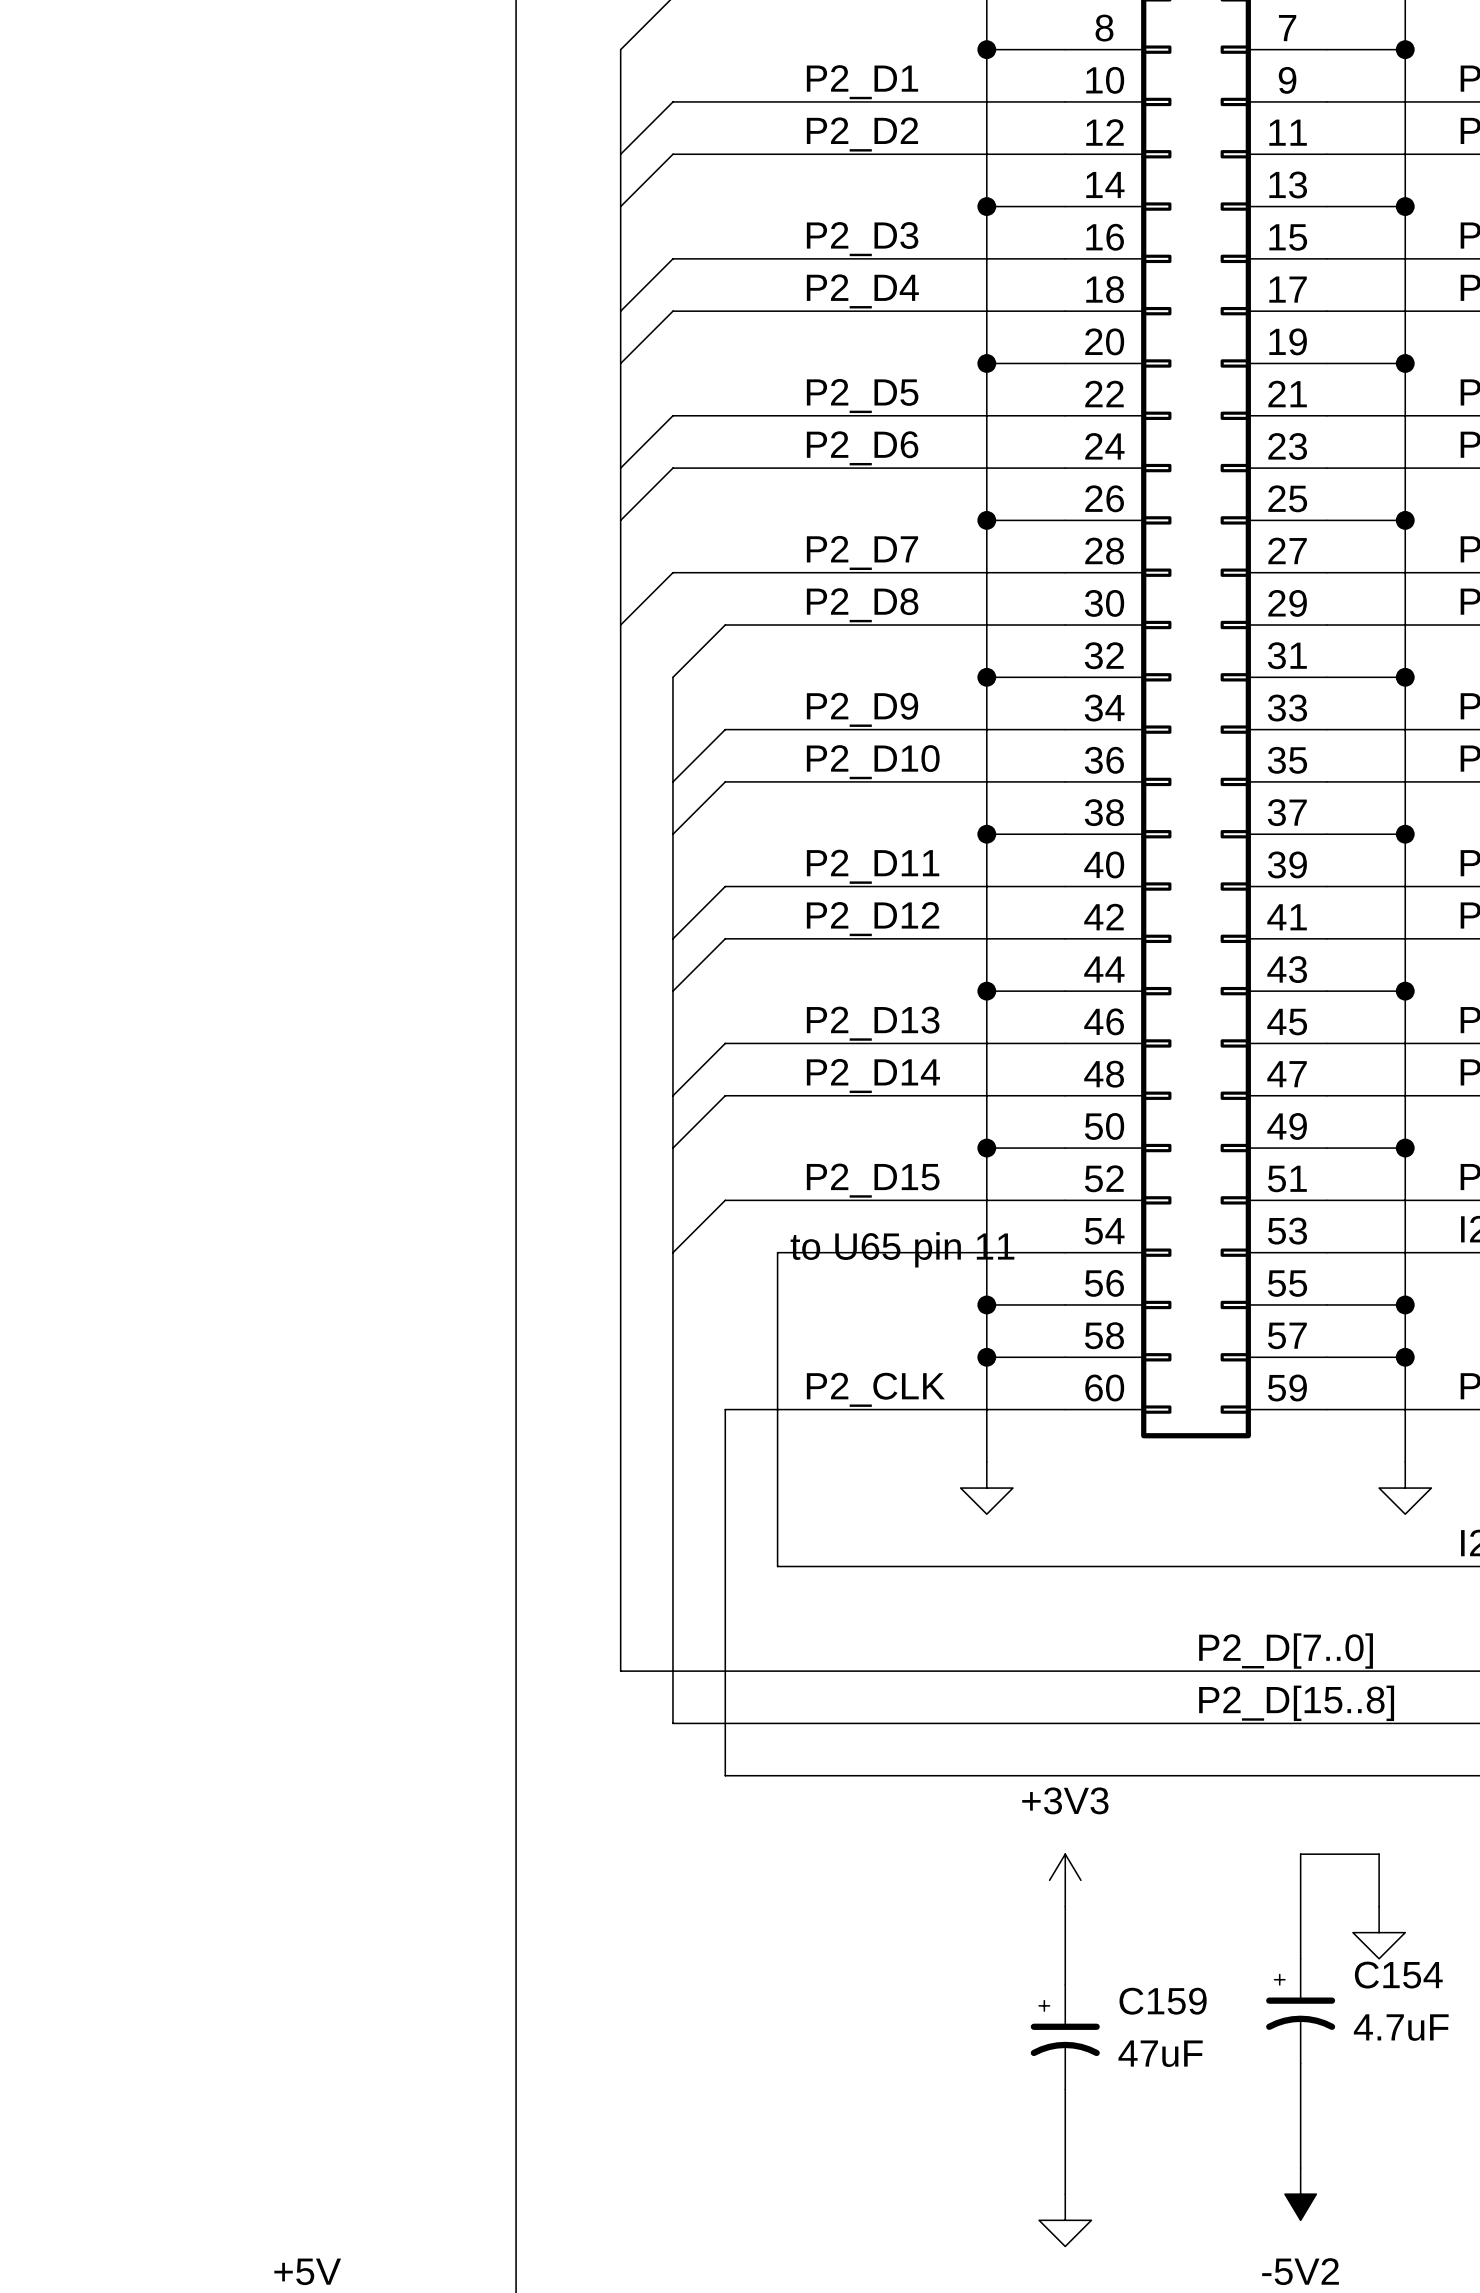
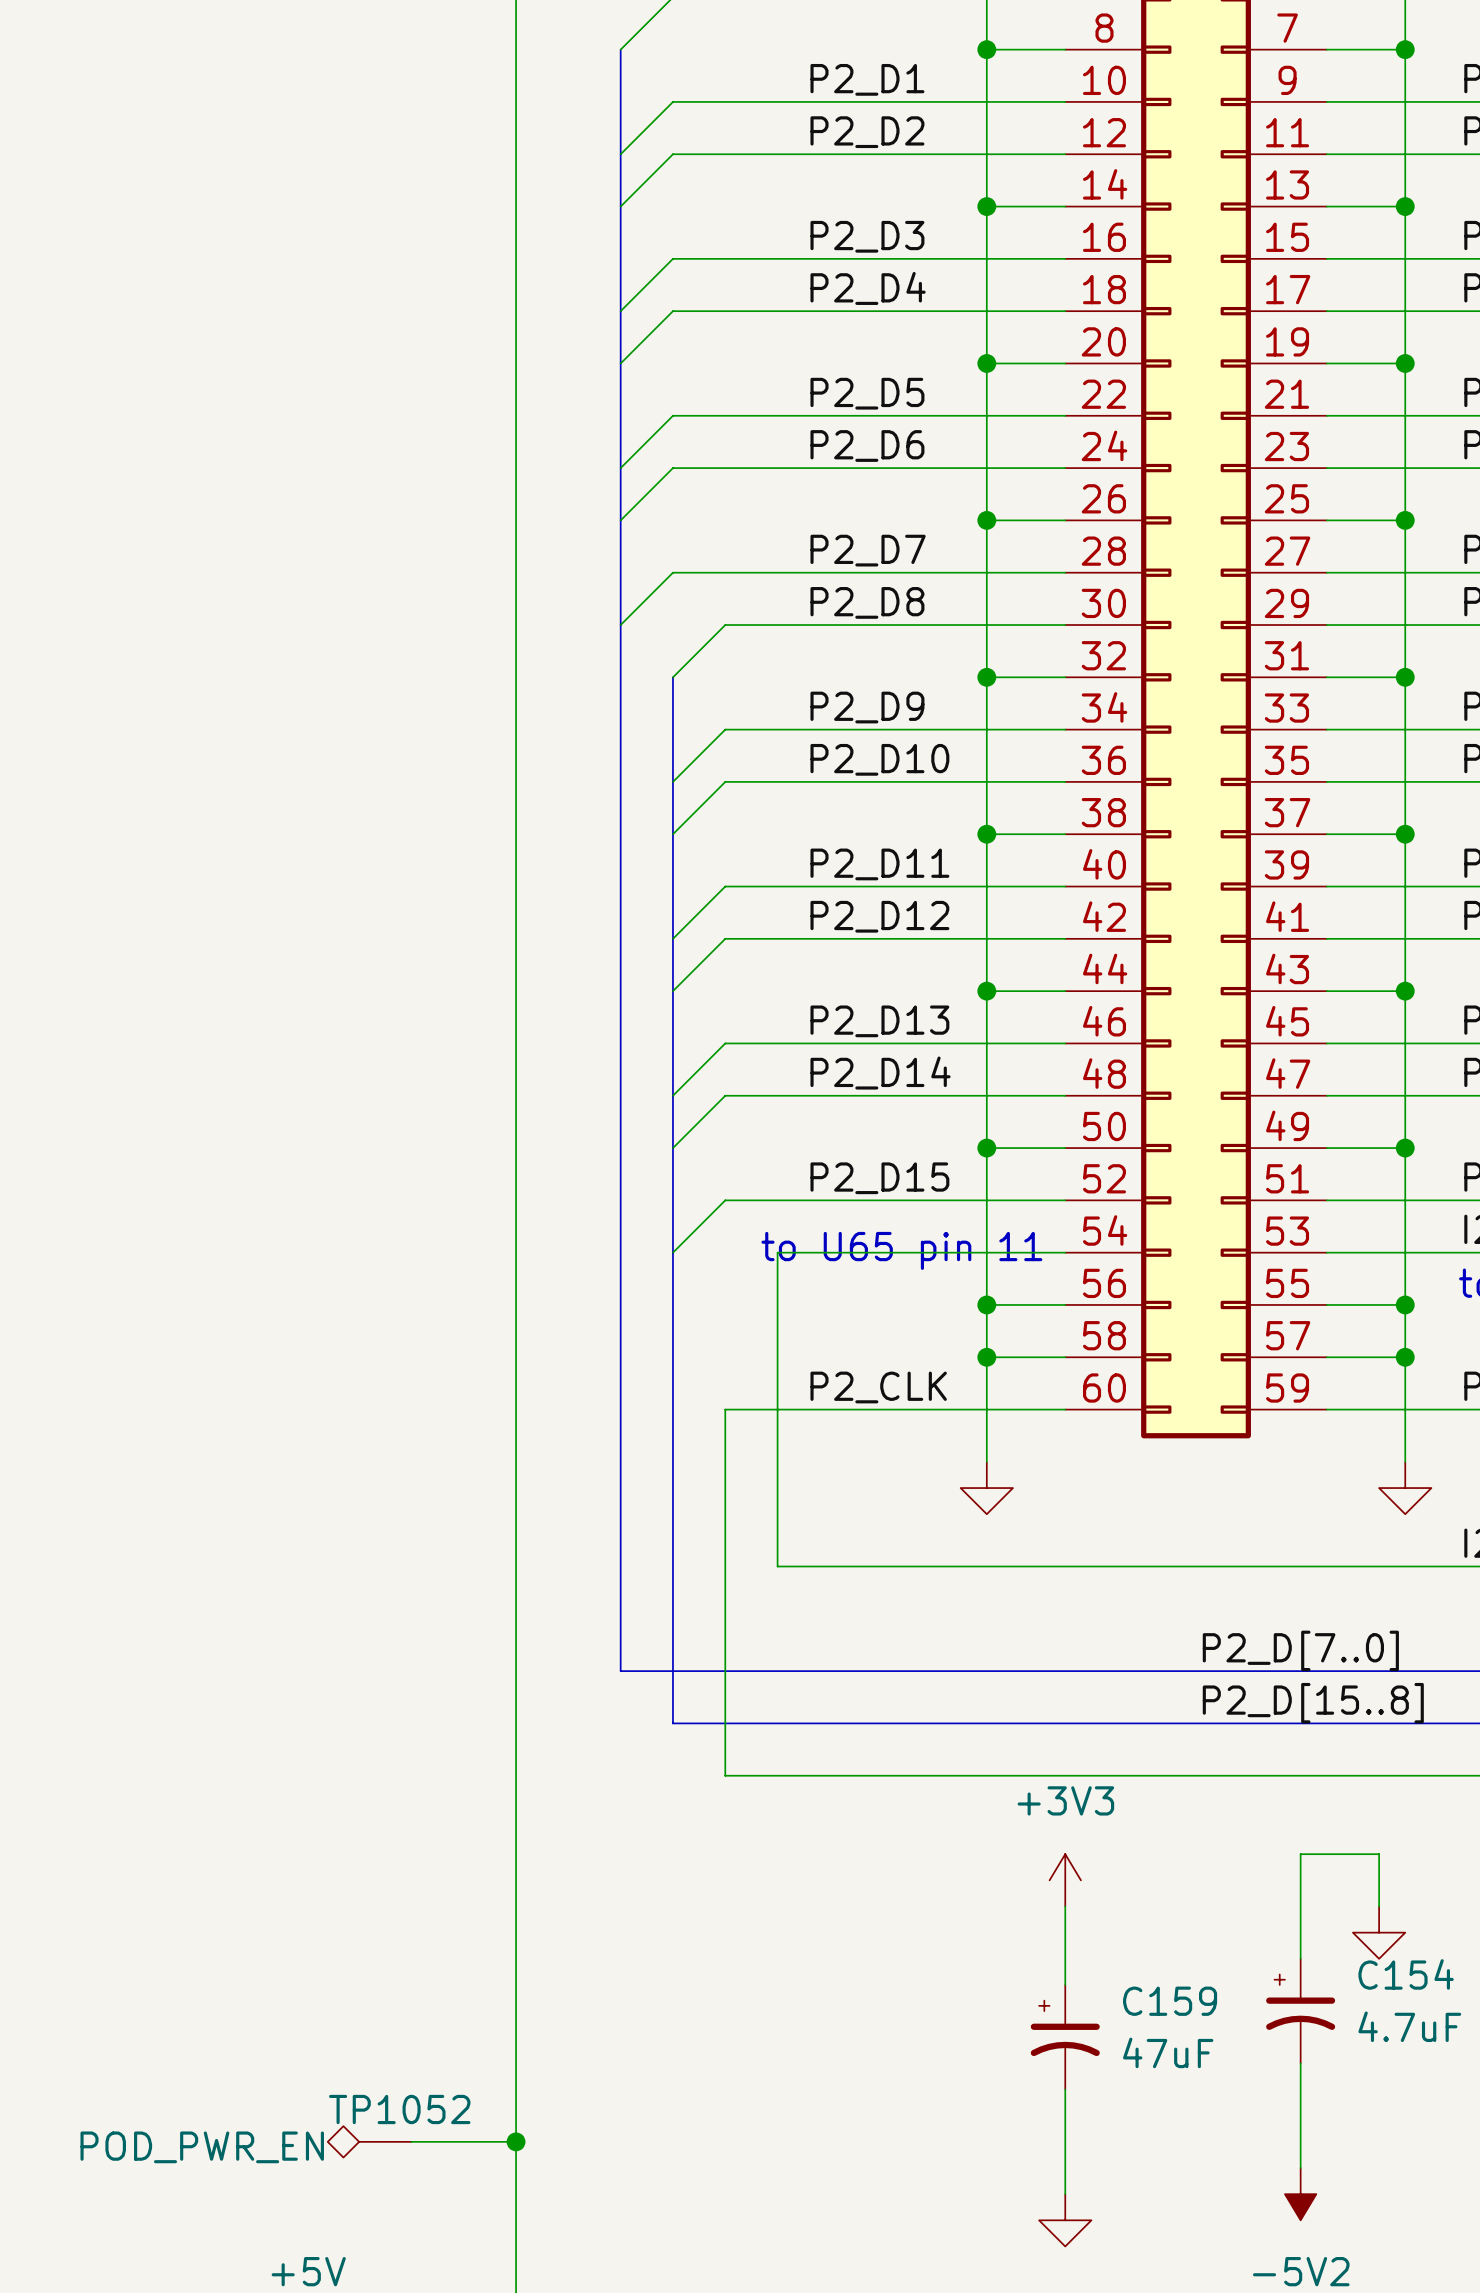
TP1052: none -> POD_PWR_EN (369, 2141)
wire: none -> (411, 2141) (516, 2141)
junction: none -> (516, 2141)

